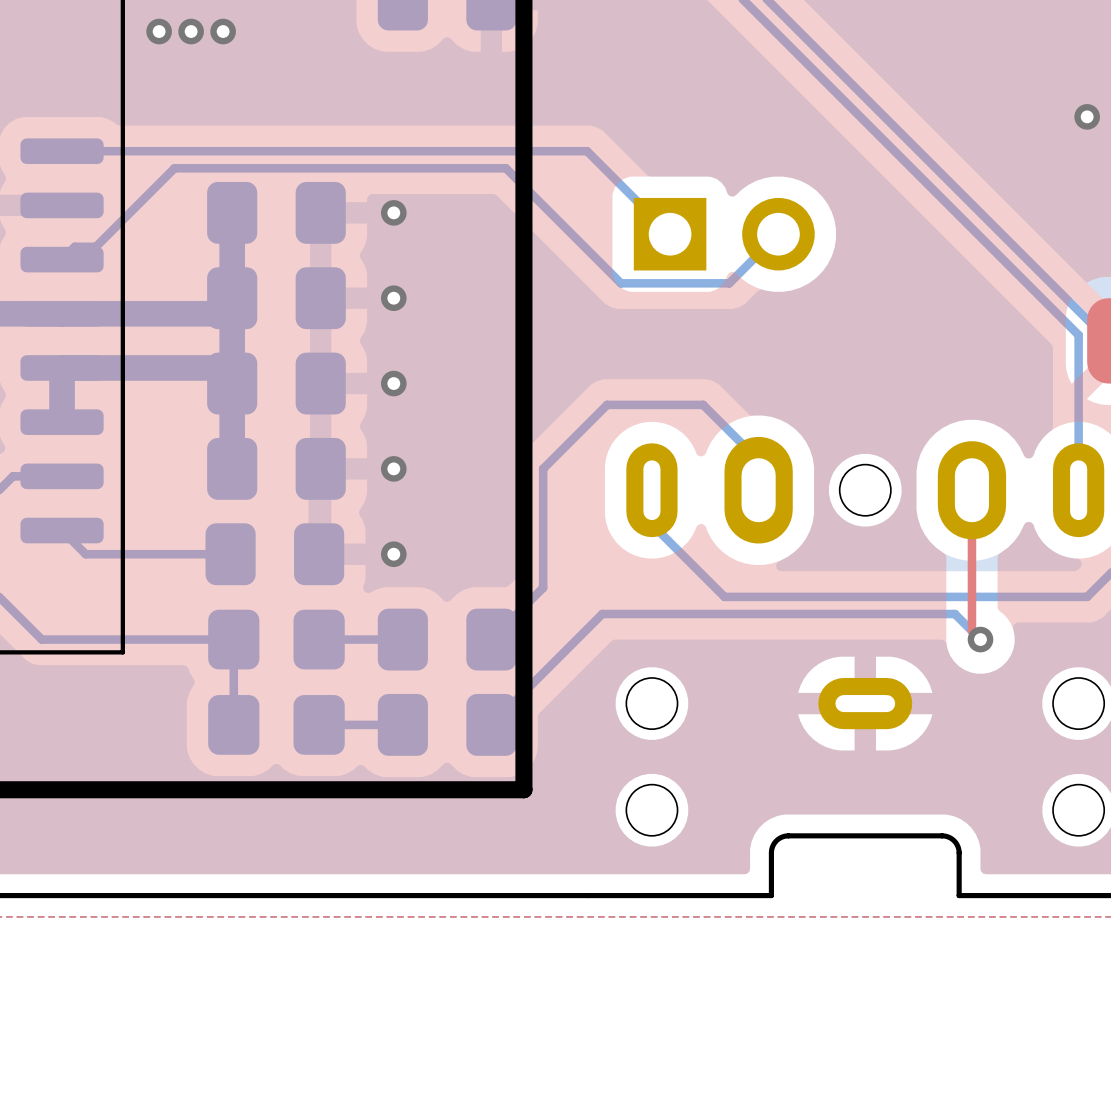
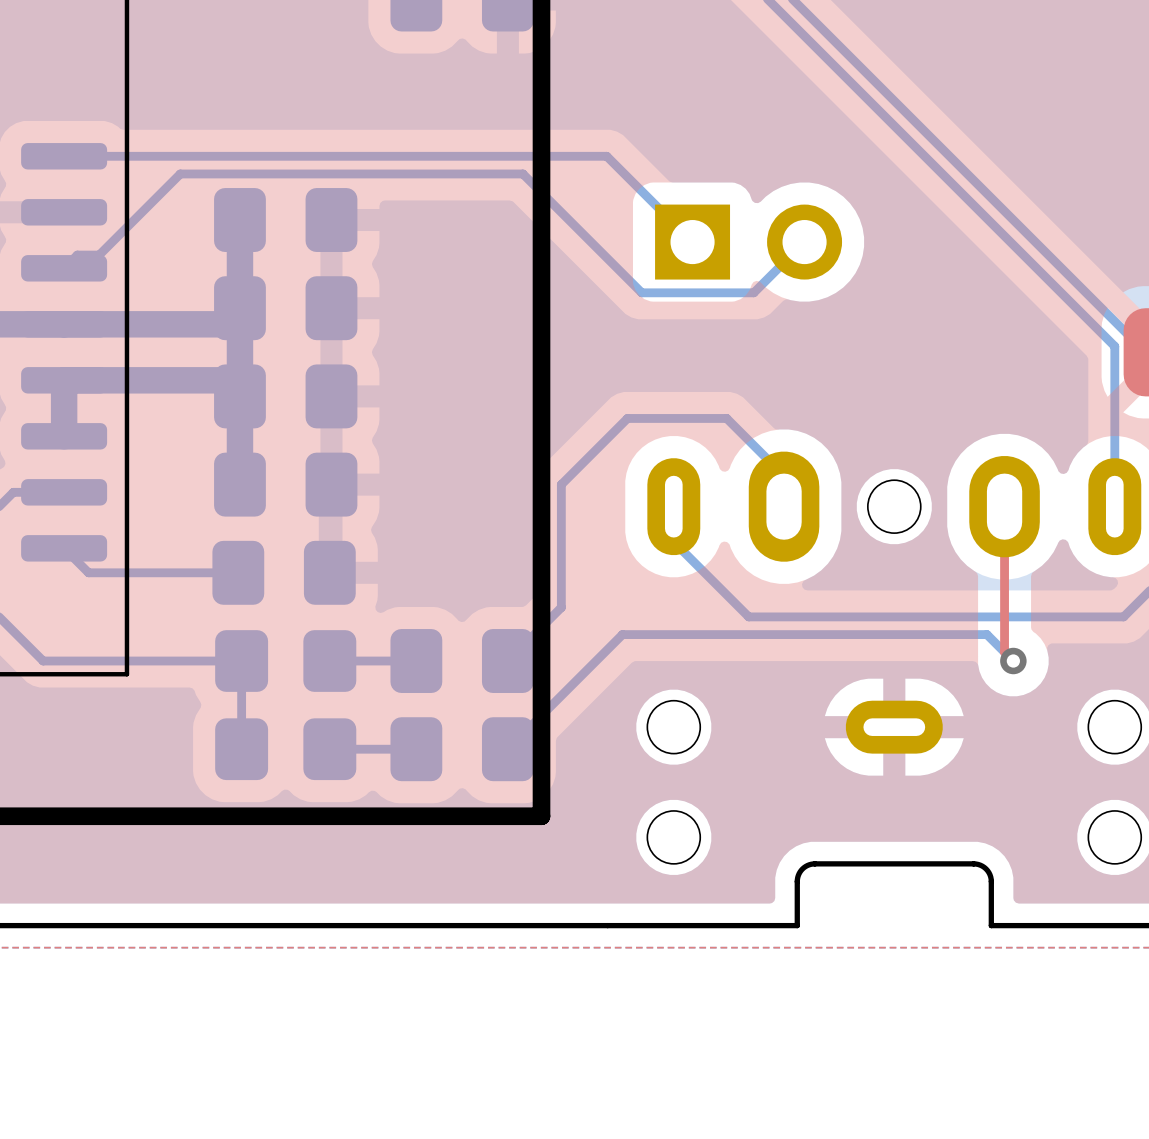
via: (159, 31) -> none
via: (191, 31) -> none
via: (223, 31) -> none
via: (1087, 116) -> none
via: (393, 212) -> none
via: (393, 298) -> none
via: (393, 383) -> none
via: (393, 468) -> none
via: (393, 554) -> none

